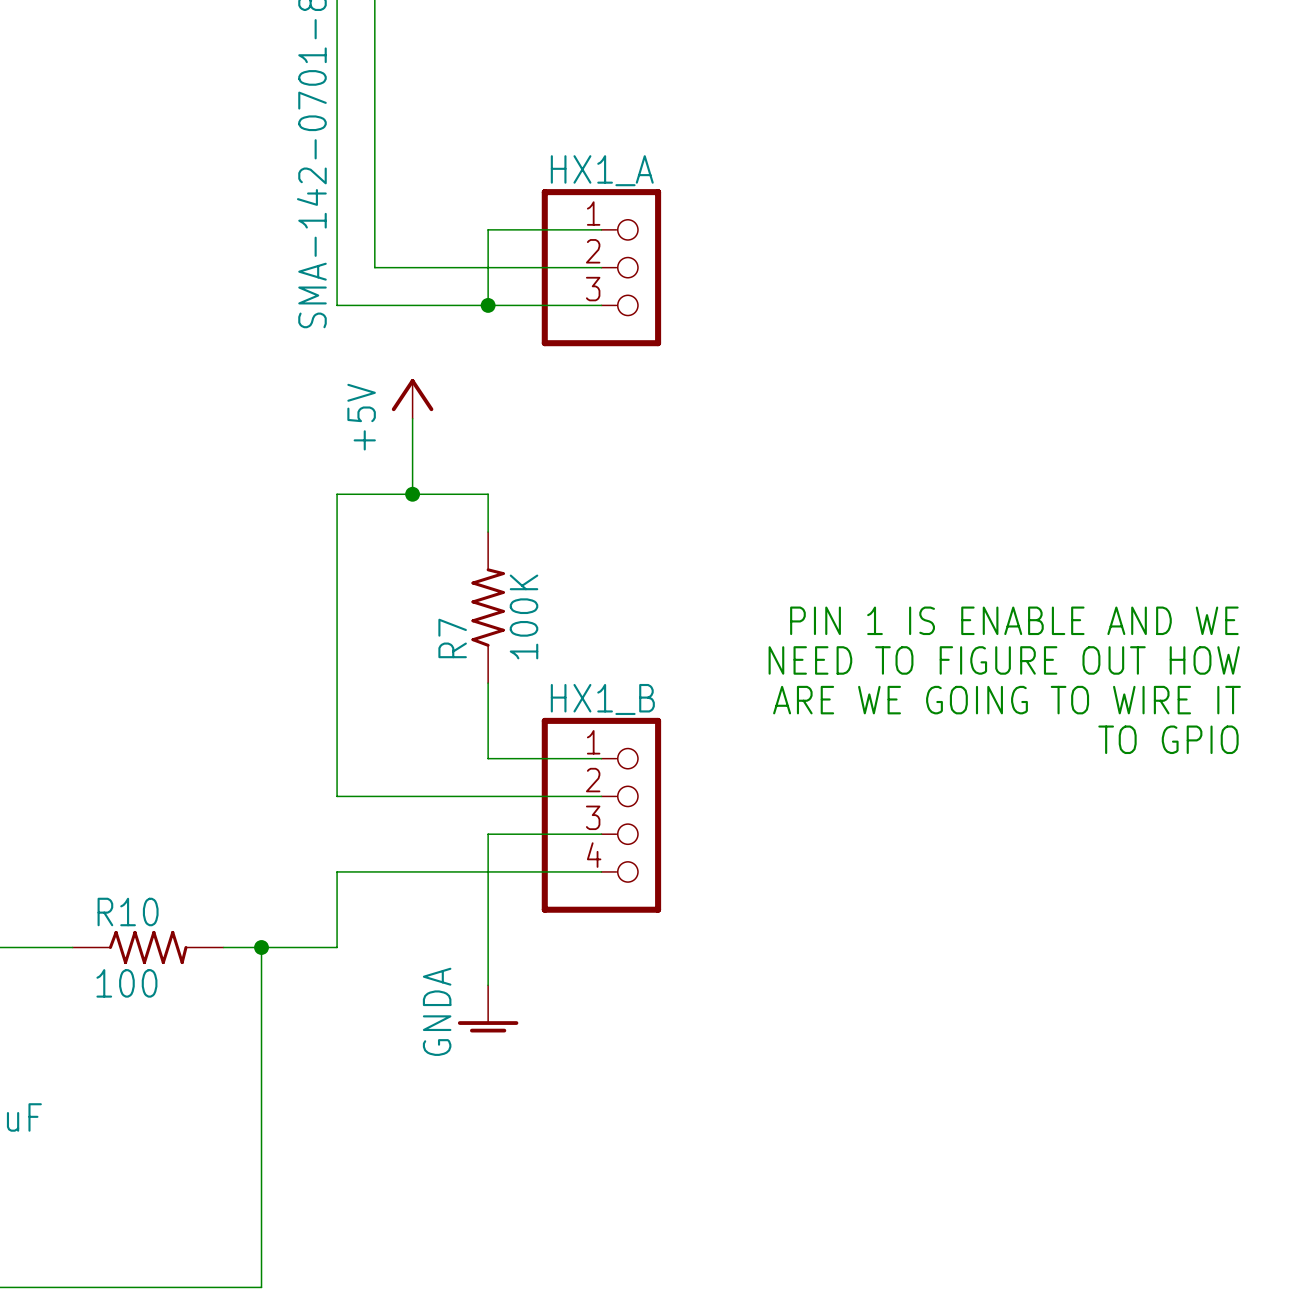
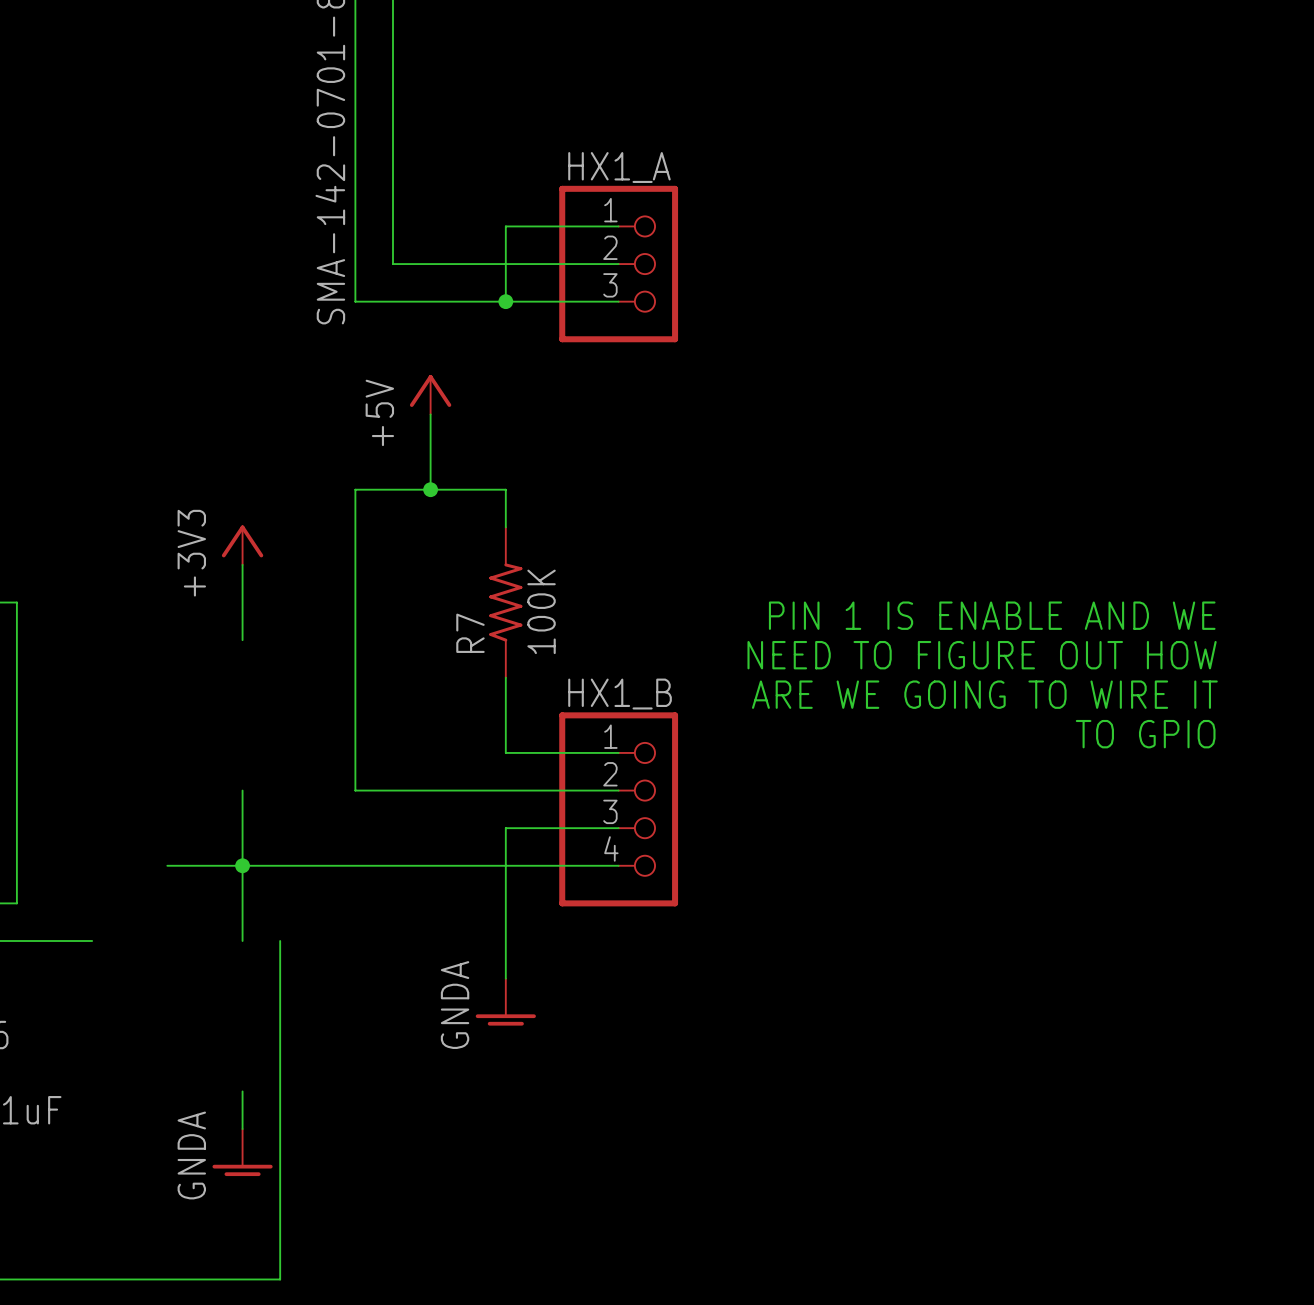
power symbol: none -> +3V3 (242, 545)
wire: none -> (242, 564) (242, 640)
text position: PIN 1 IS ENABLE AND WE (1014, 620) -> PIN 1 IS ENABLE AND WE (992, 615)
text position: NEED TO FIGURE OUT HOW (1004, 660) -> NEED TO FIGURE OUT HOW (982, 655)
text position: ARE WE GOING TO WIRE IT (1007, 700) -> ARE WE GOING TO WIRE IT (984, 694)
text position: TO GPIO (1168, 739) -> TO GPIO (1145, 734)
wire: none -> (242, 790) (242, 940)
wire: (337, 871) (337, 947) (223, 947) -> (355, 865) (167, 865)
R10: 100 (148, 947) -> none
junction position: (261, 947) -> (242, 865)
wire: none -> (242, 1091) (242, 1129)
power symbol: none -> GNDA (242, 1152)

